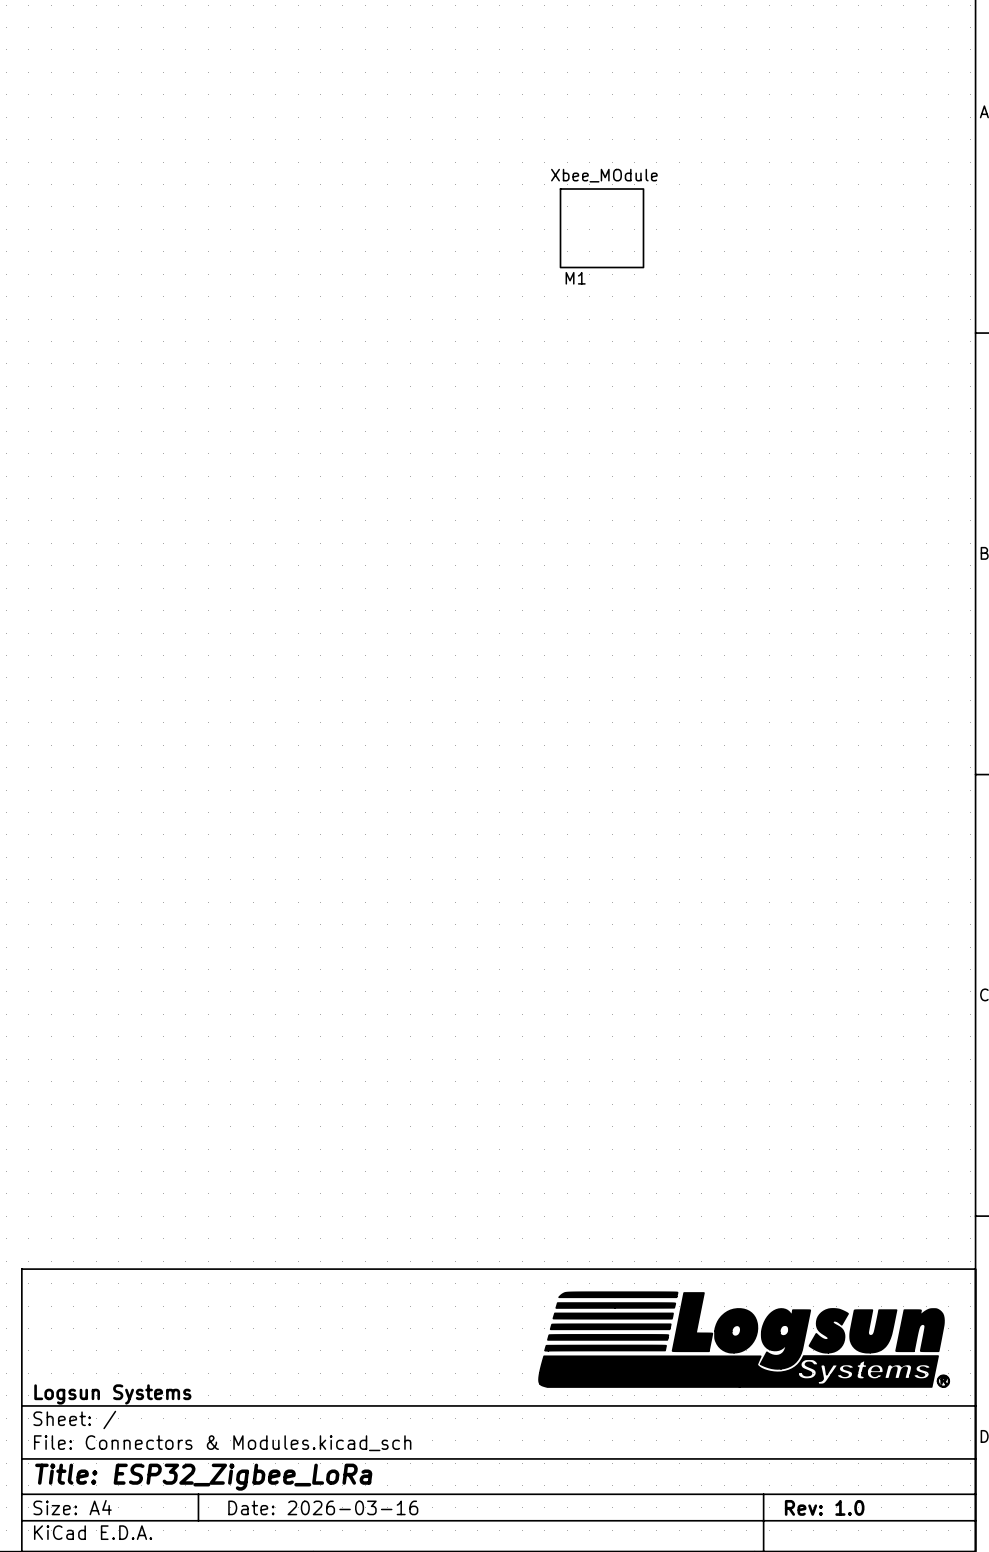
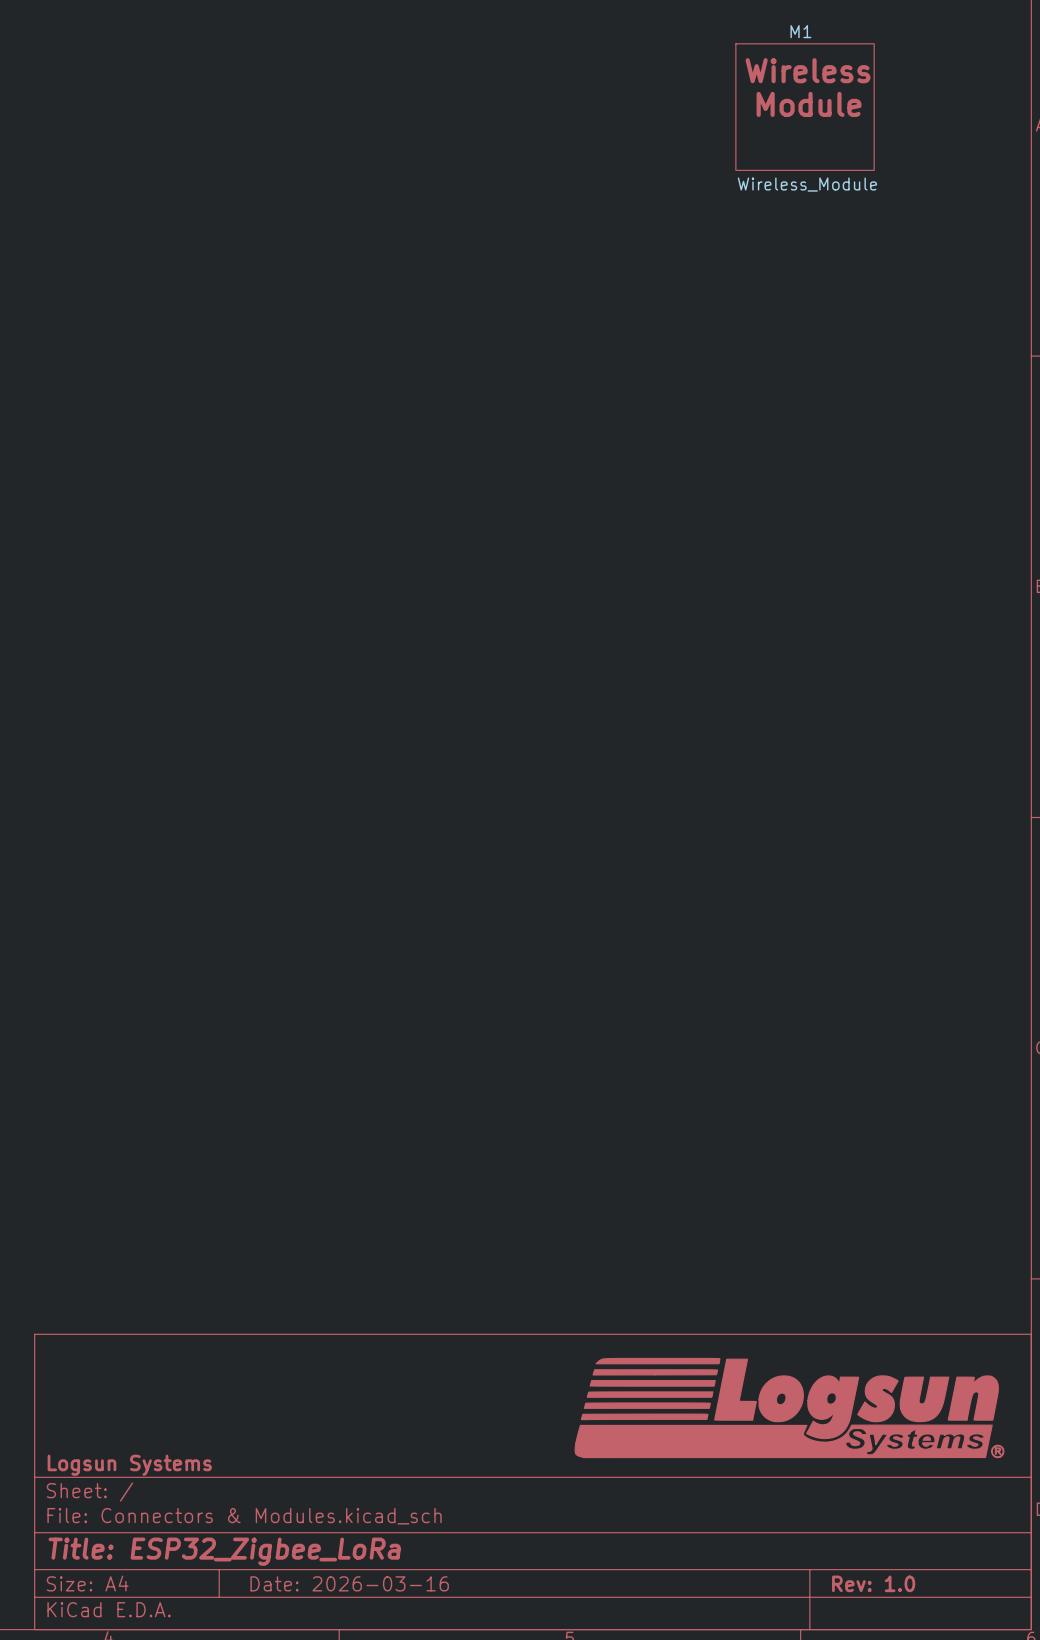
M1 value: Xbee_MOdule (604, 175) -> Wireless_Module (807, 184)
M1 symbol: [560, 189, 644, 268] -> [735, 43, 875, 171]
M1 name position: M1 (575, 278) -> M1 (800, 31)

